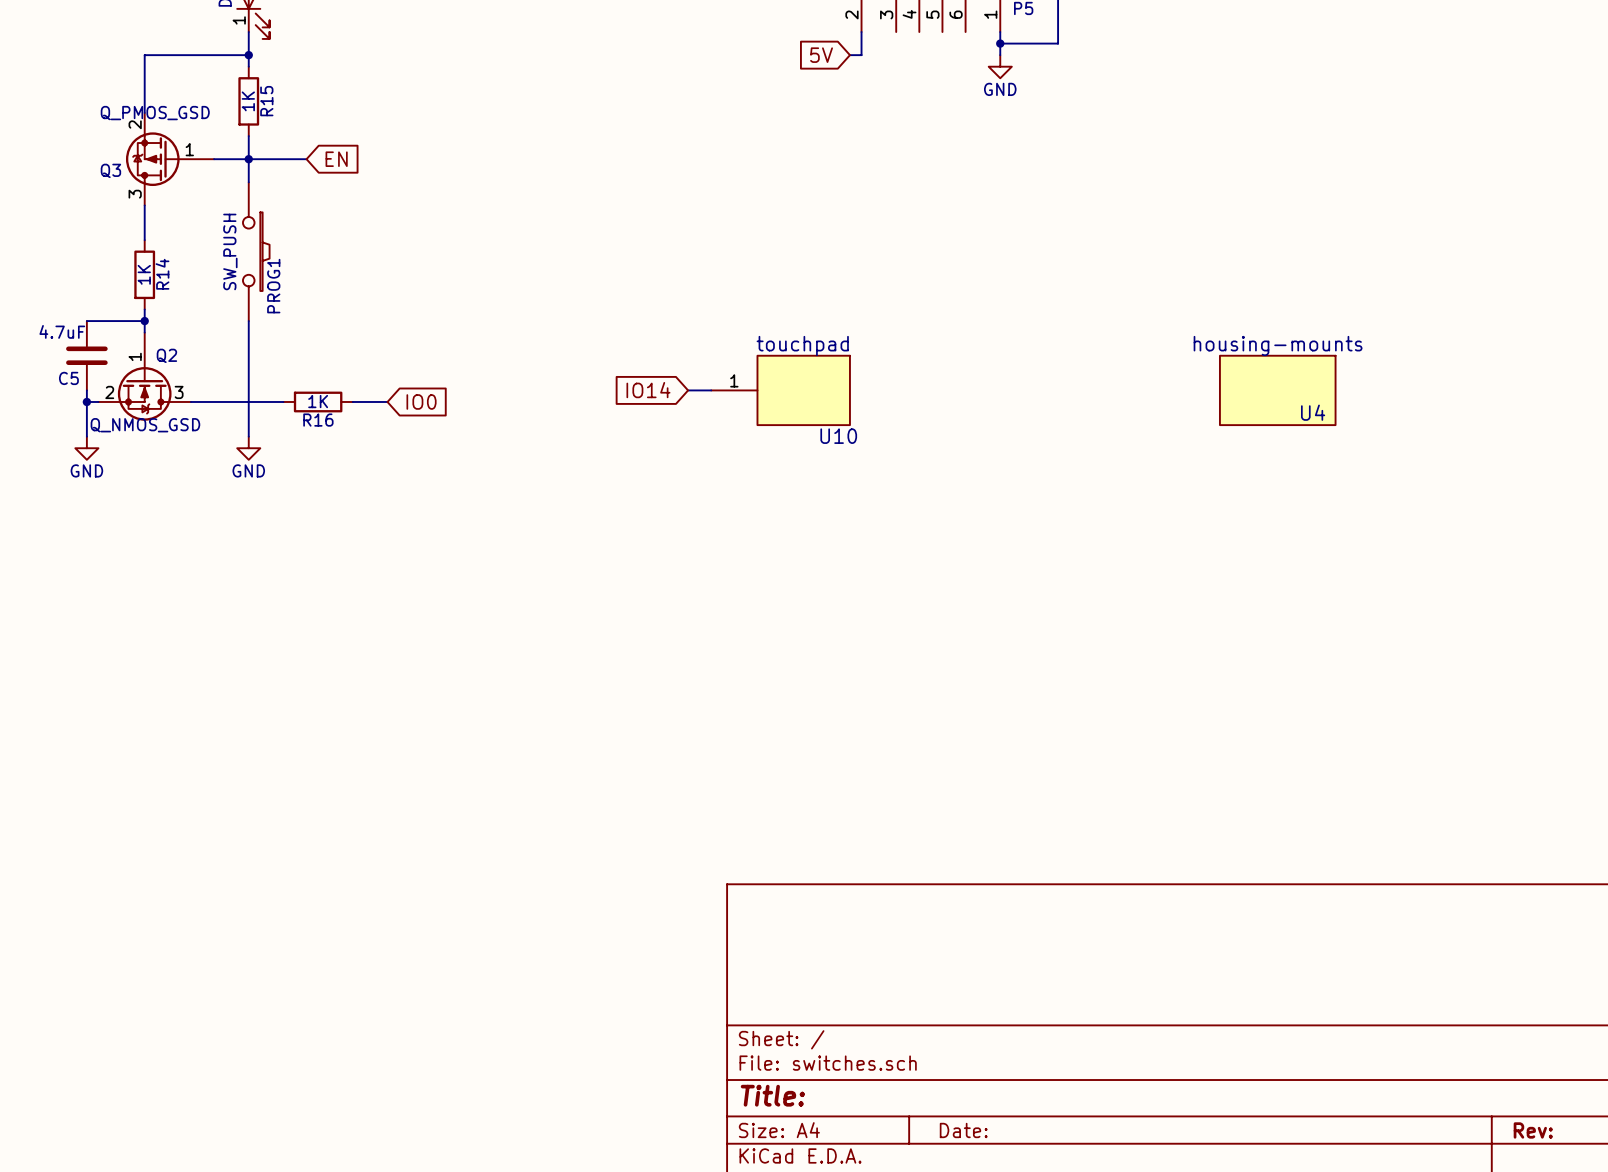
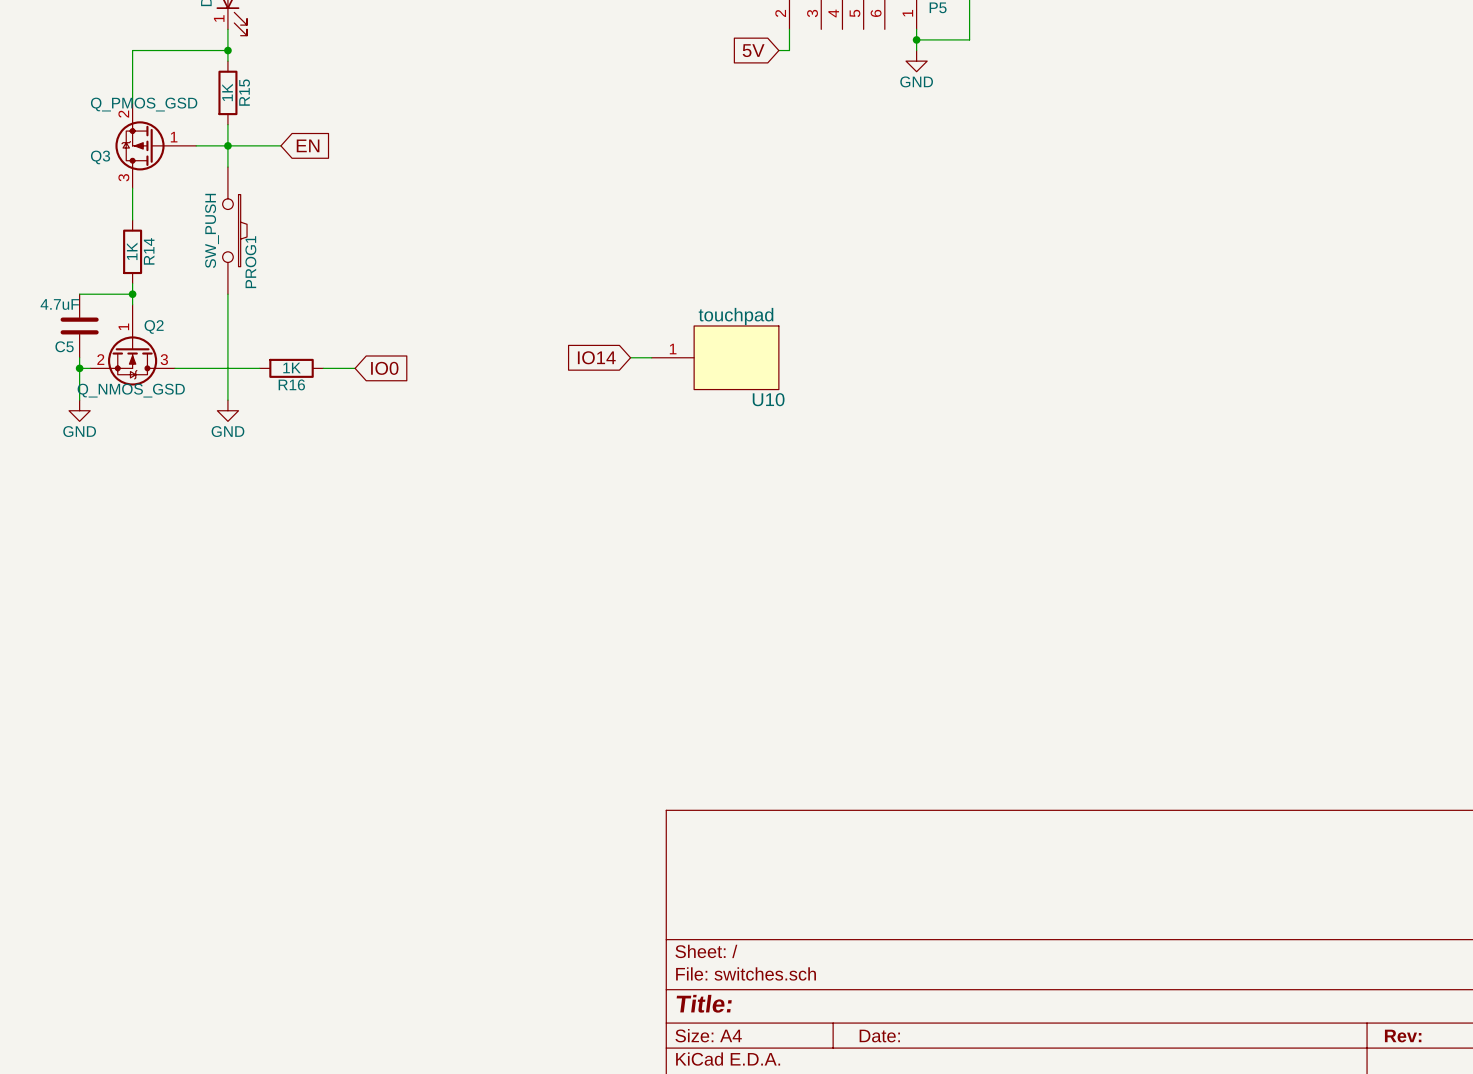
U4: housing-mounts (1277, 390) -> none

